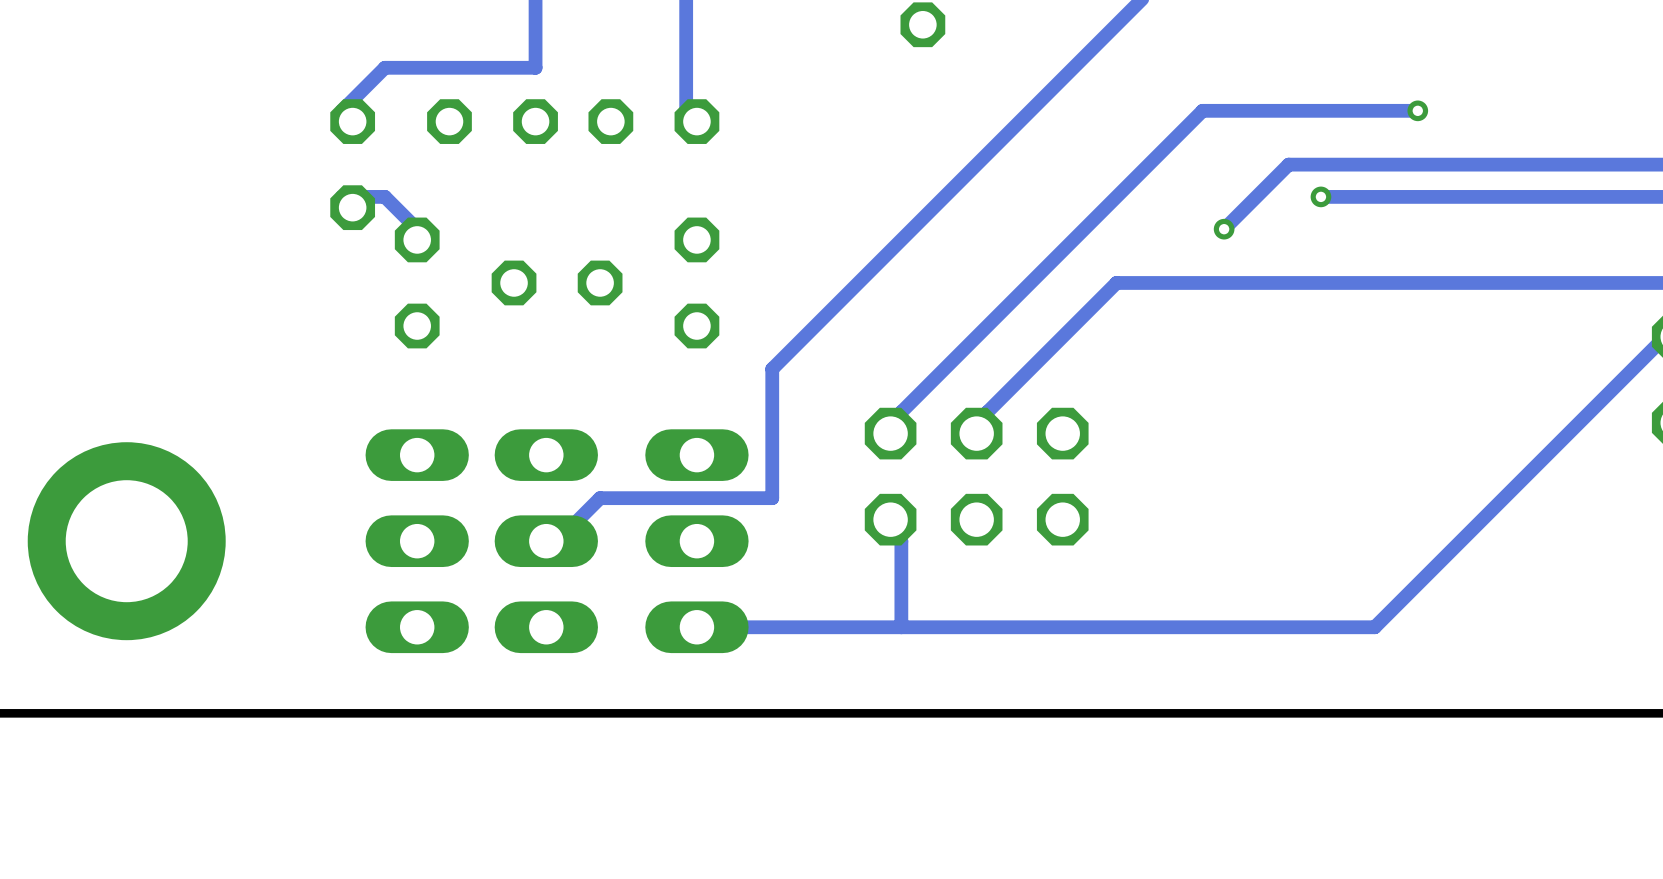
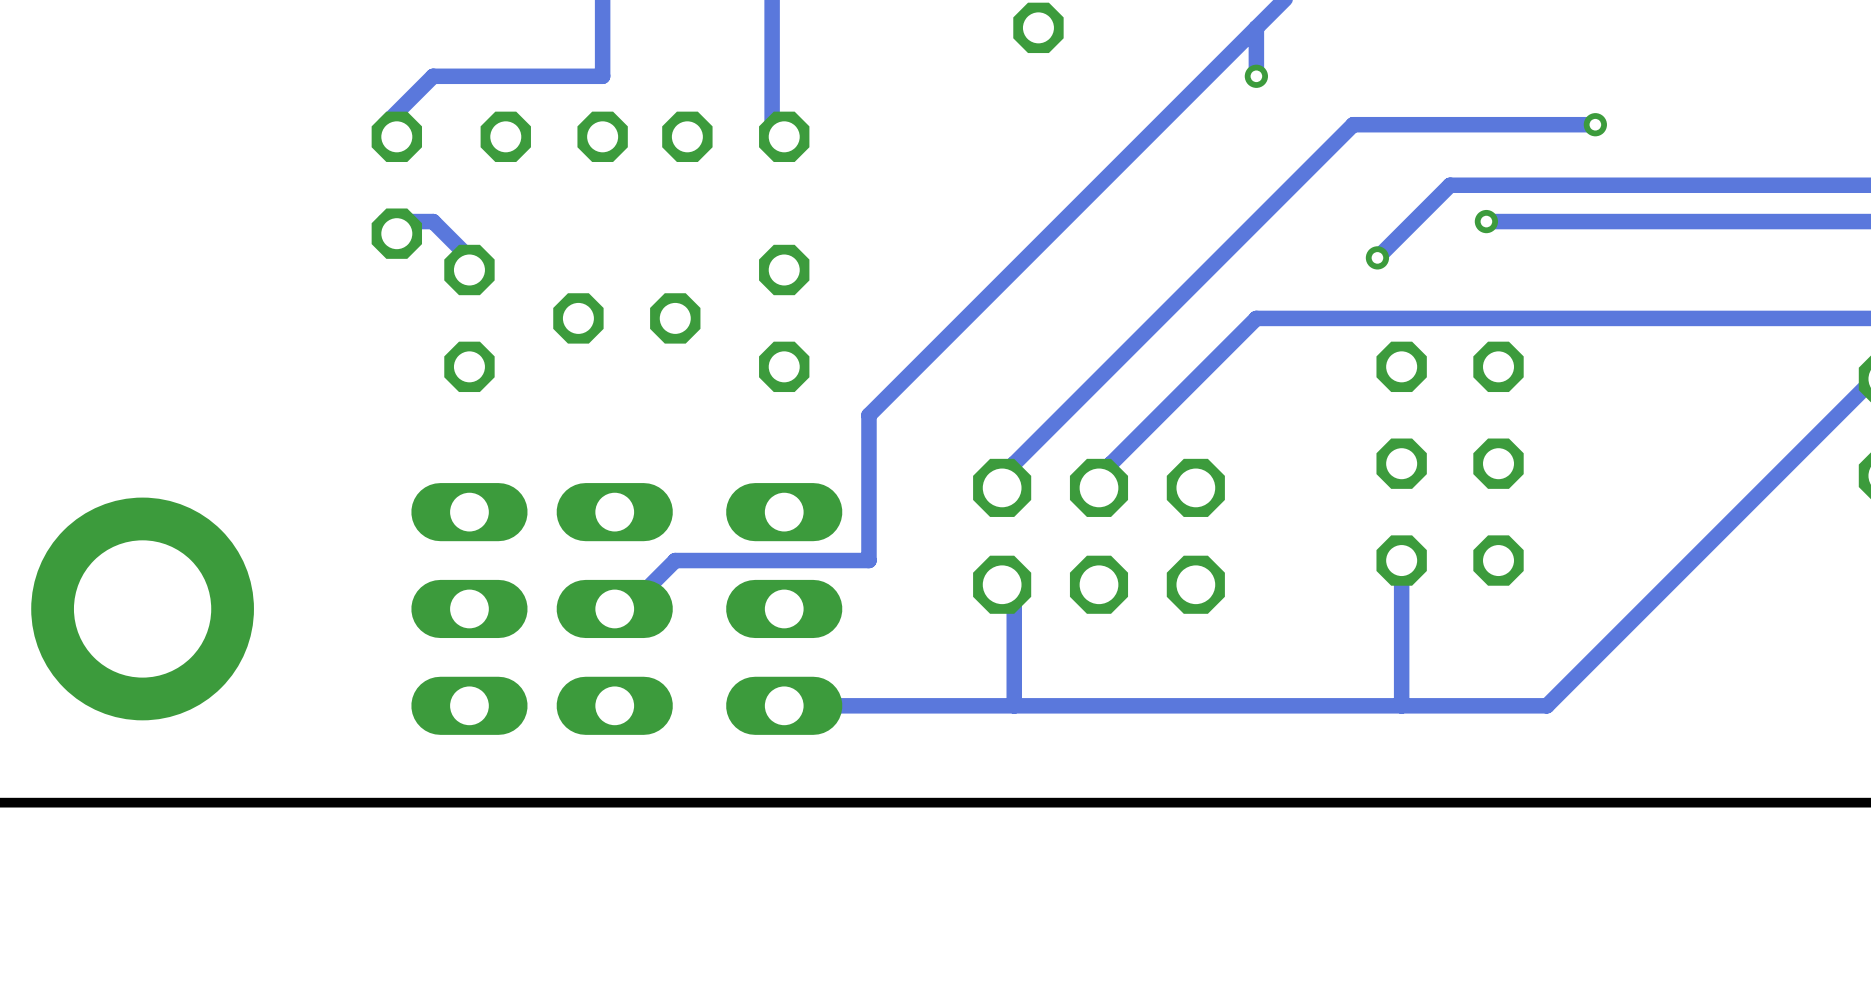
track: none -> (1256, 27) (1256, 76)
via: none -> (1256, 76)
part: none -> (1401, 415)
part: none -> (1498, 415)
track: none -> (1401, 560) (1401, 705)
part: none -> (1450, 560)

